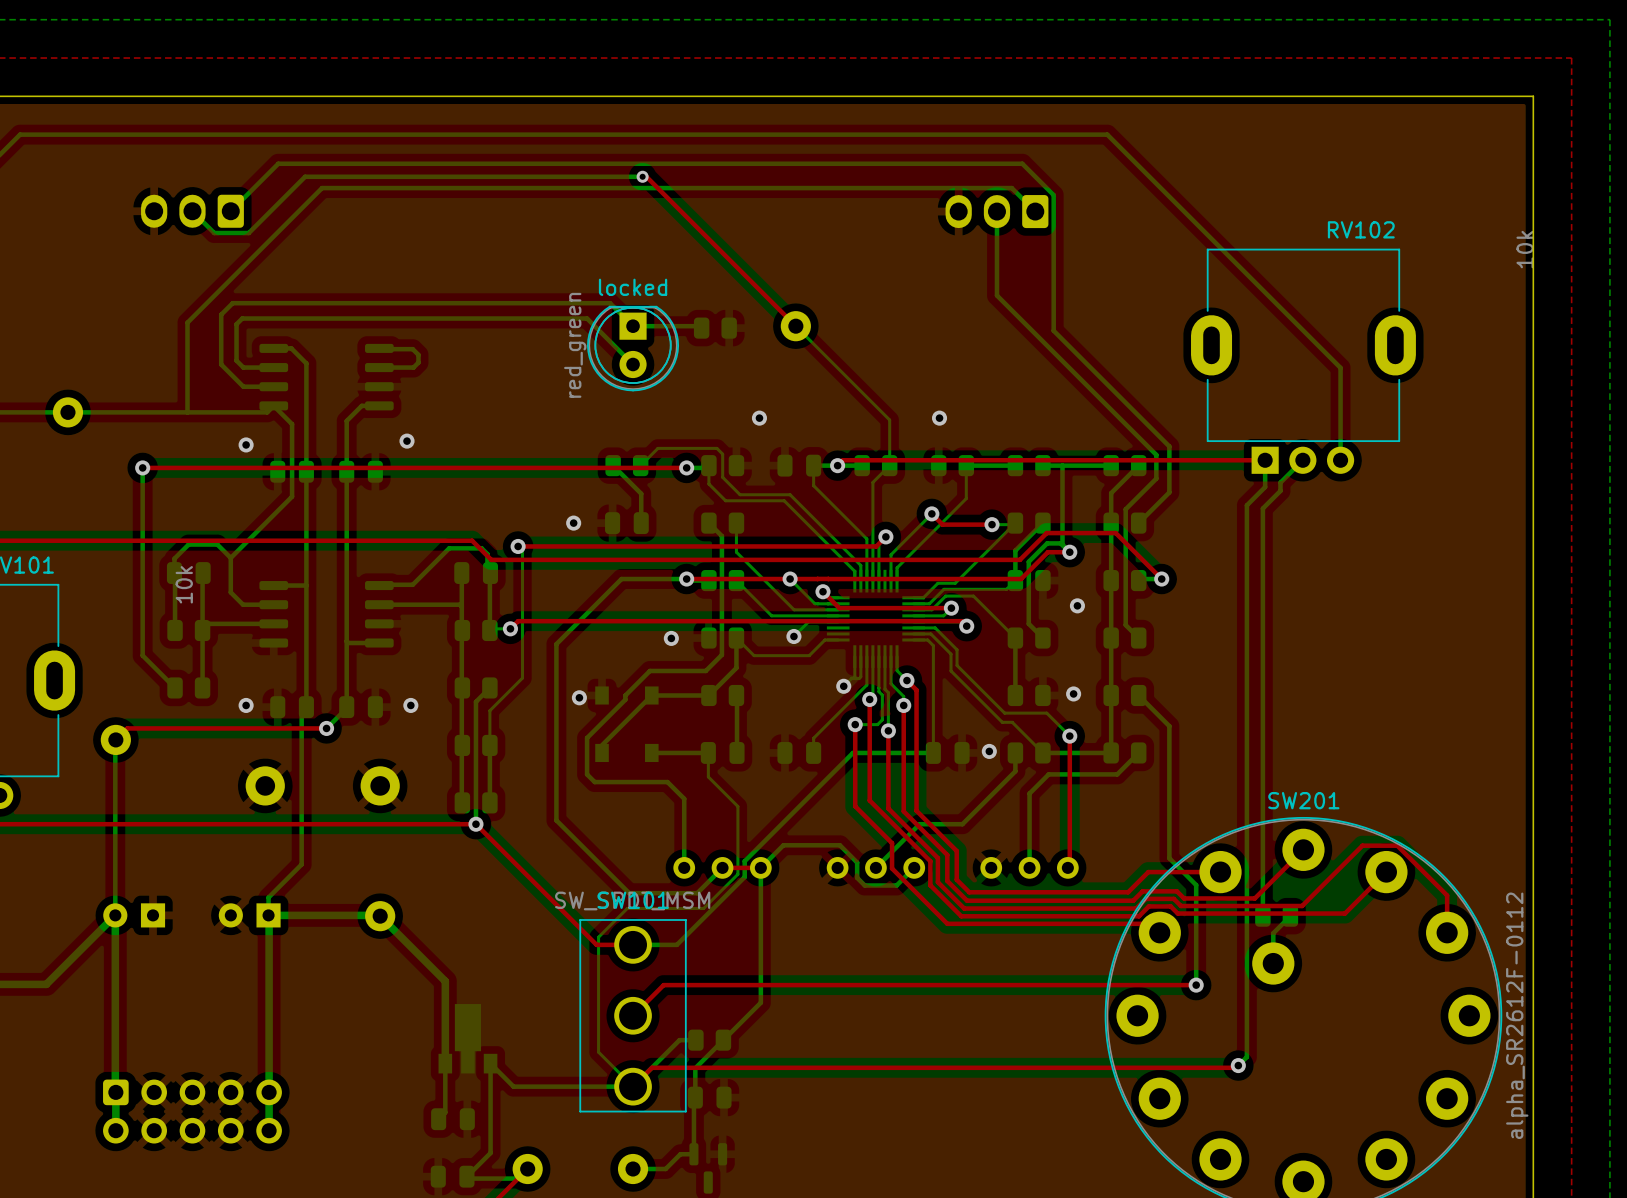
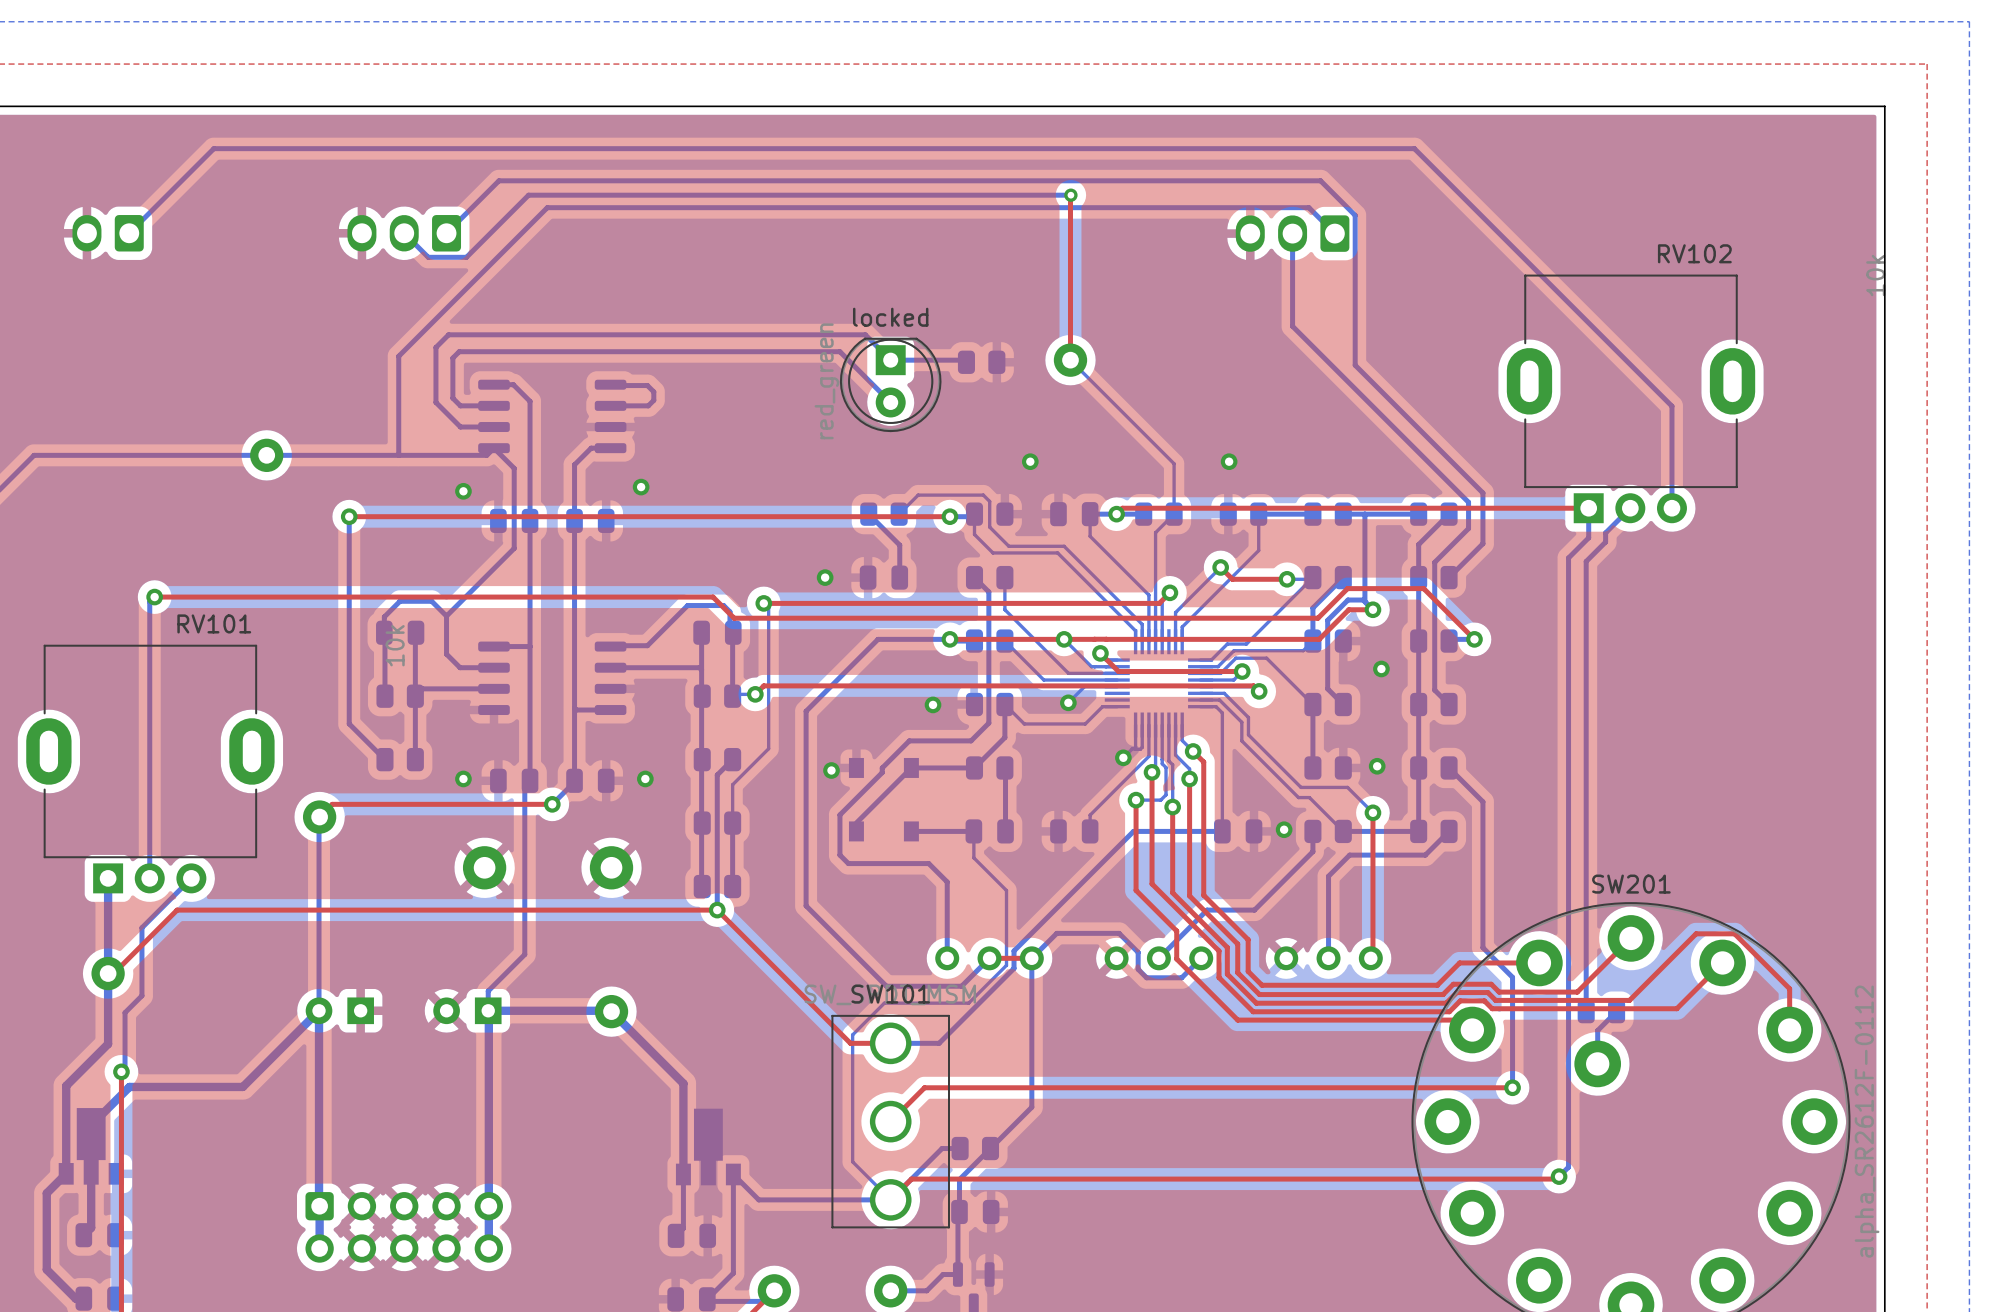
bottom track: none -> (901, 195) (1070, 195)
top track: (642, 176) (646, 176) (795, 326) -> (1070, 195) (1070, 360)
via: (642, 176) -> none
via: none -> (1070, 195)

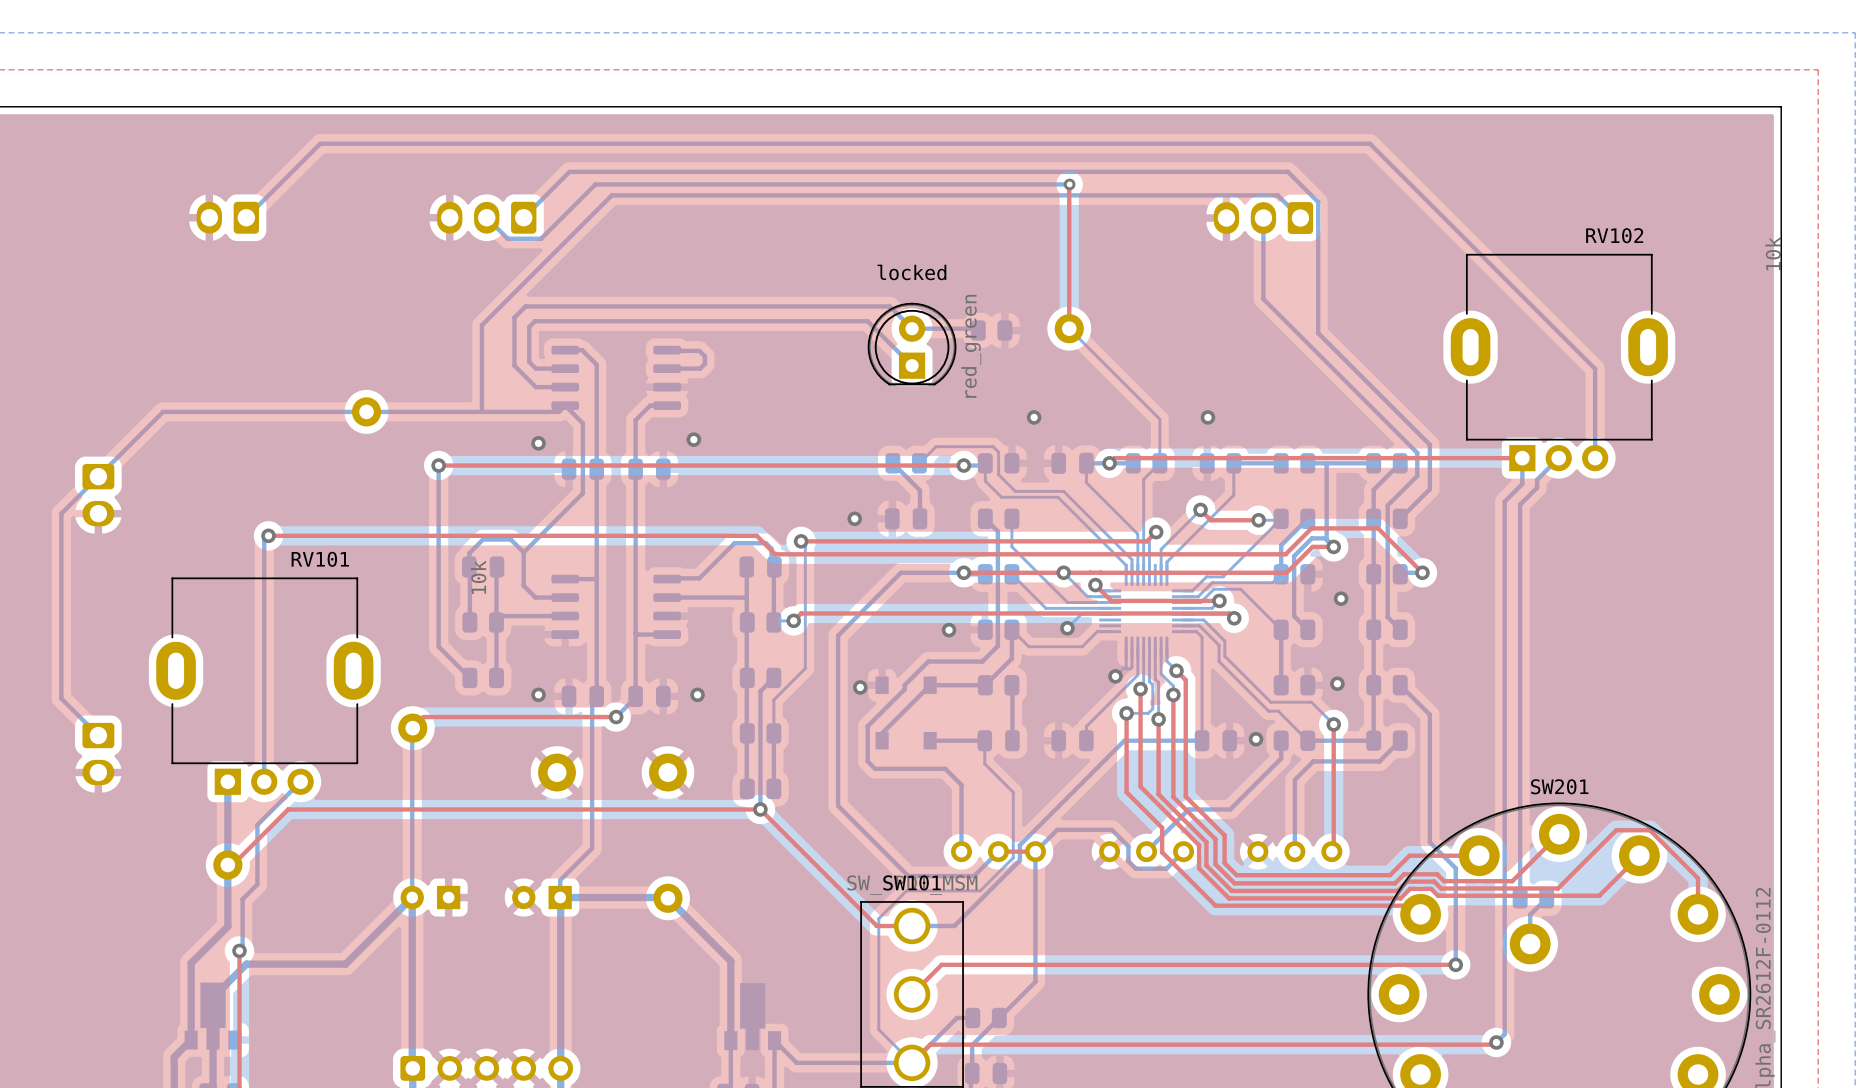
locked rotation: 0° (890, 384) -> 180° (912, 344)

